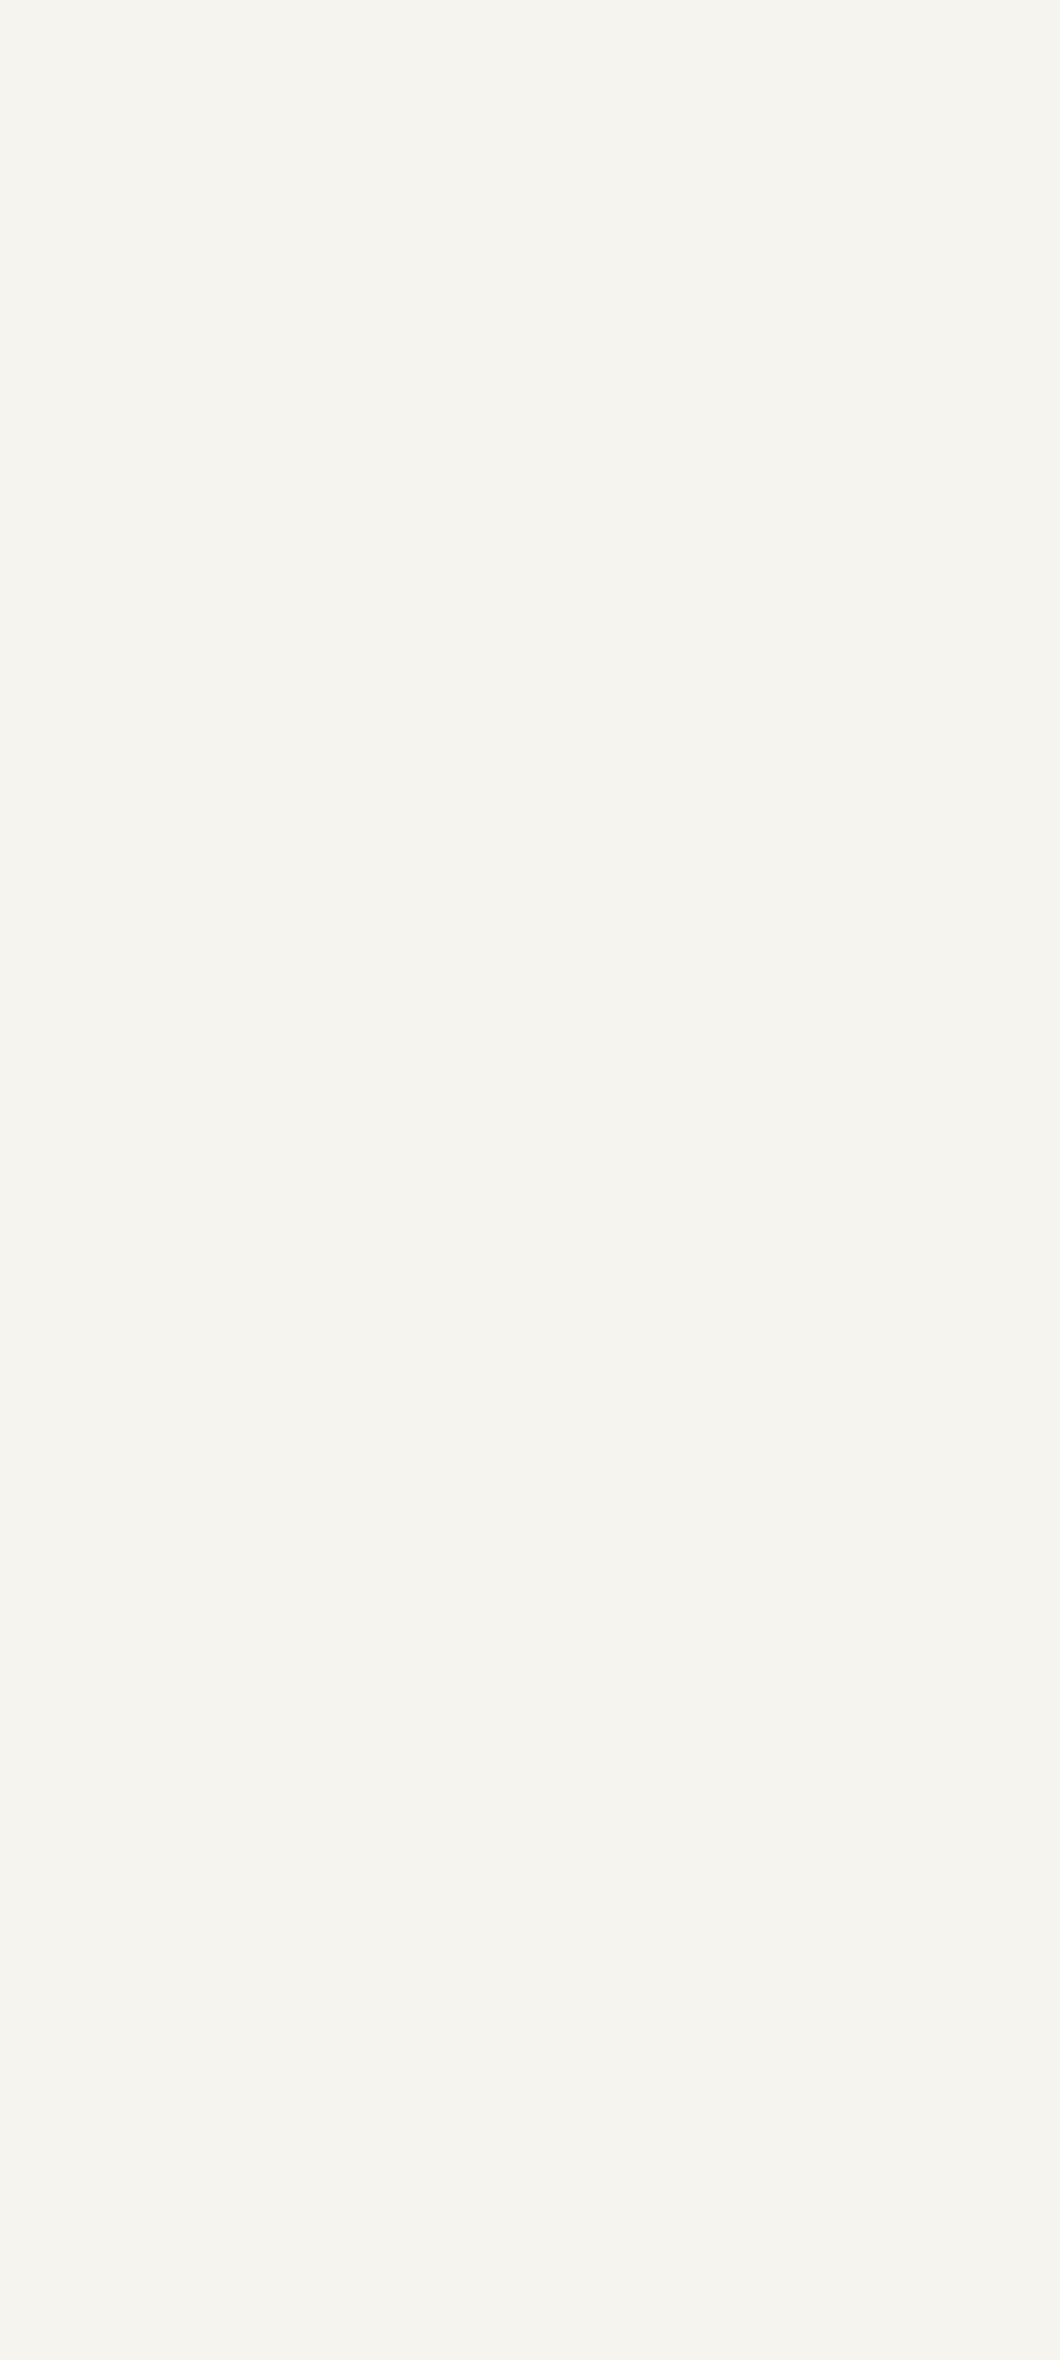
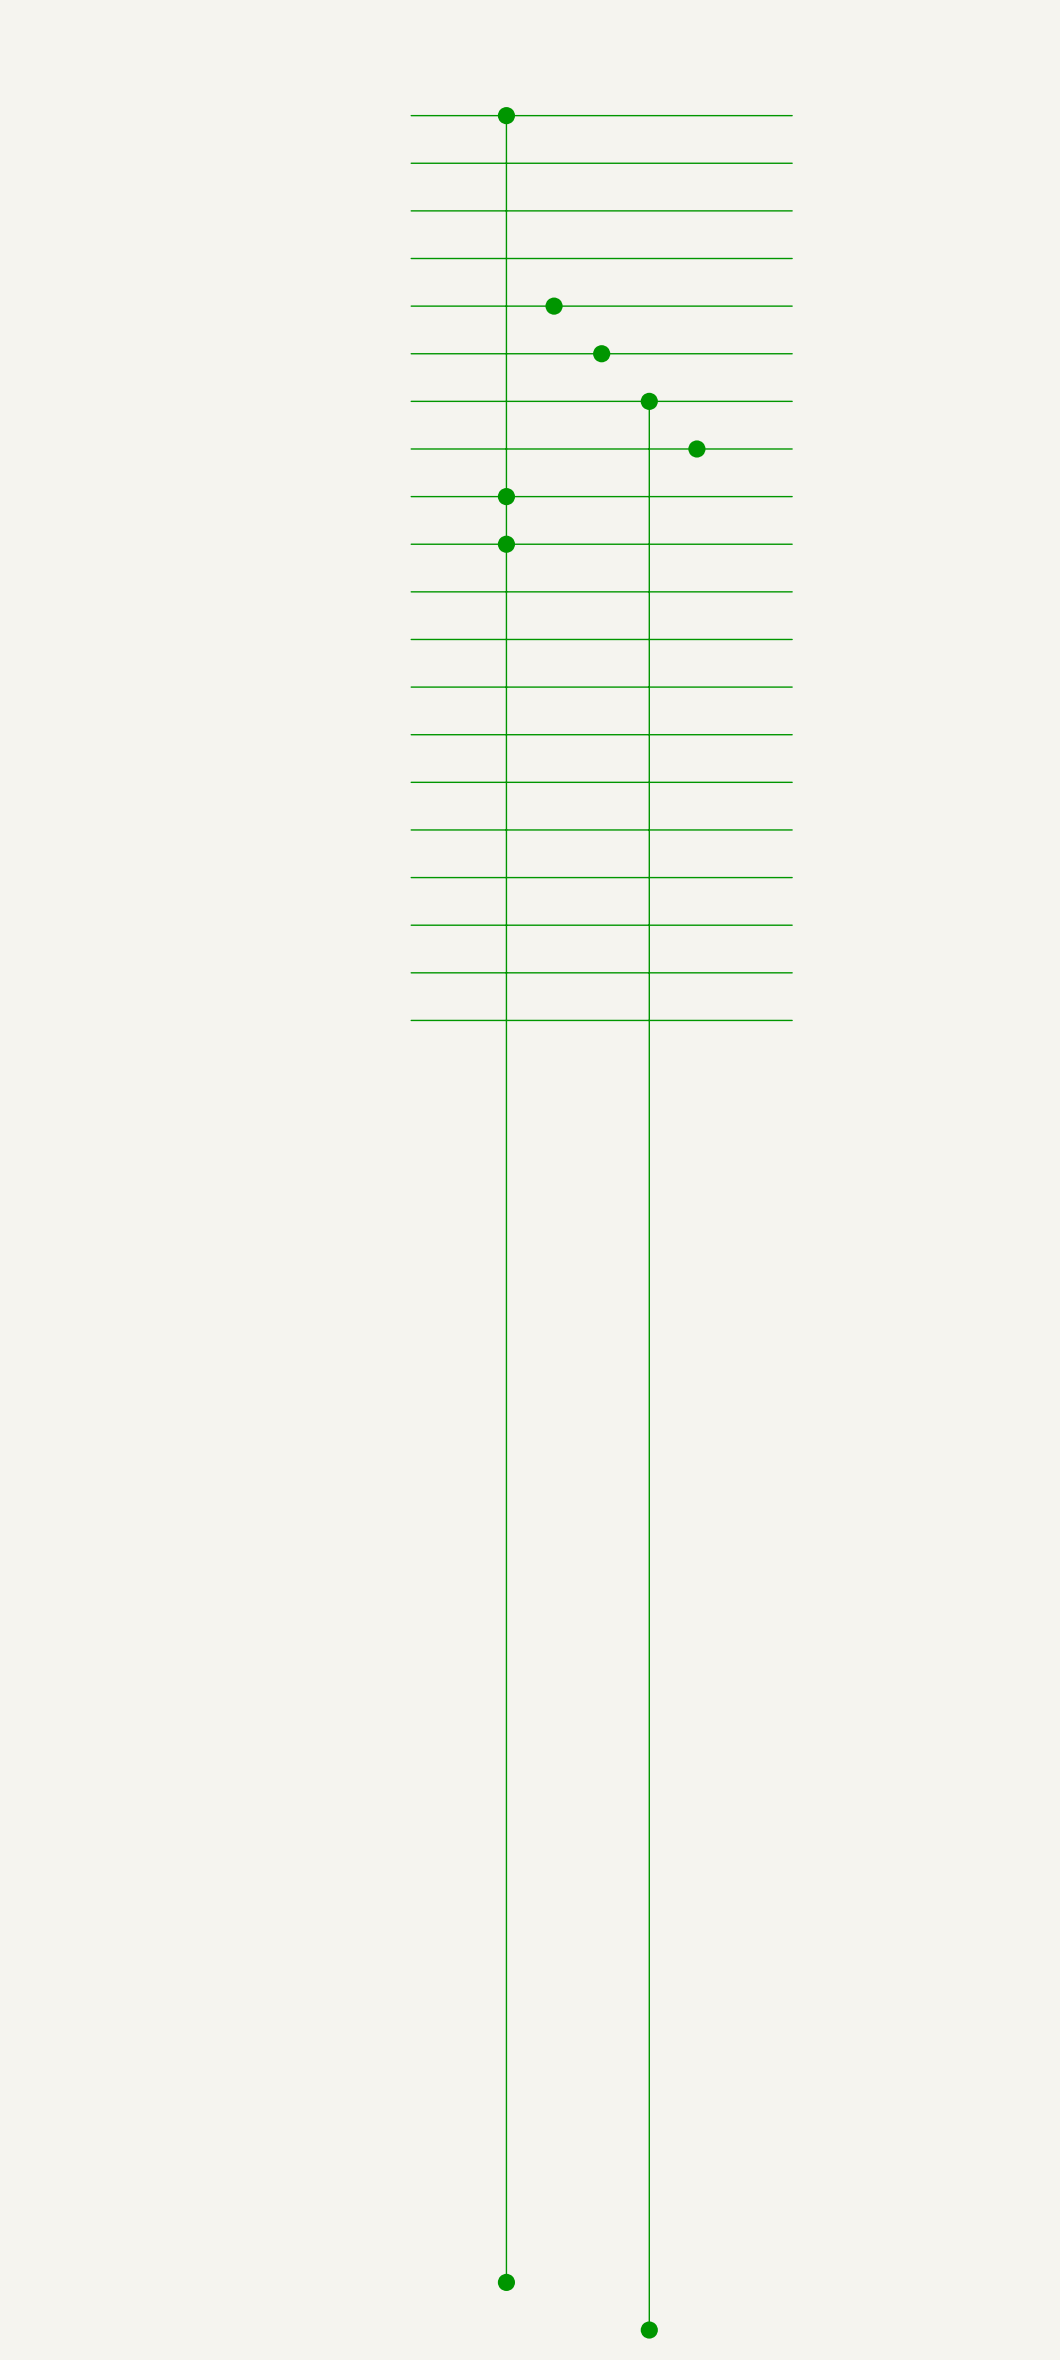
wire: none -> (411, 115) (792, 115)
wire: none -> (506, 115) (506, 2282)
junction: none -> (506, 115)
wire: none -> (411, 163) (792, 163)
wire: none -> (411, 210) (792, 210)
wire: none -> (411, 258) (792, 258)
wire: none -> (411, 306) (792, 306)
junction: none -> (554, 306)
wire: none -> (411, 353) (792, 353)
junction: none -> (601, 353)
wire: none -> (411, 401) (792, 401)
wire: none -> (649, 401) (649, 2330)
junction: none -> (649, 401)
wire: none -> (411, 448) (792, 448)
junction: none -> (696, 448)
wire: none -> (411, 496) (792, 496)
junction: none -> (506, 496)
wire: none -> (411, 544) (792, 544)
junction: none -> (506, 544)
wire: none -> (411, 591) (792, 591)
wire: none -> (411, 639) (792, 639)
wire: none -> (411, 687) (792, 687)
wire: none -> (411, 734) (792, 734)
wire: none -> (411, 782) (792, 782)
wire: none -> (411, 829) (792, 829)
wire: none -> (411, 877) (792, 877)
wire: none -> (411, 925) (792, 925)
wire: none -> (411, 972) (792, 972)
wire: none -> (411, 1020) (792, 1020)
junction: none -> (506, 2282)
junction: none -> (649, 2330)

